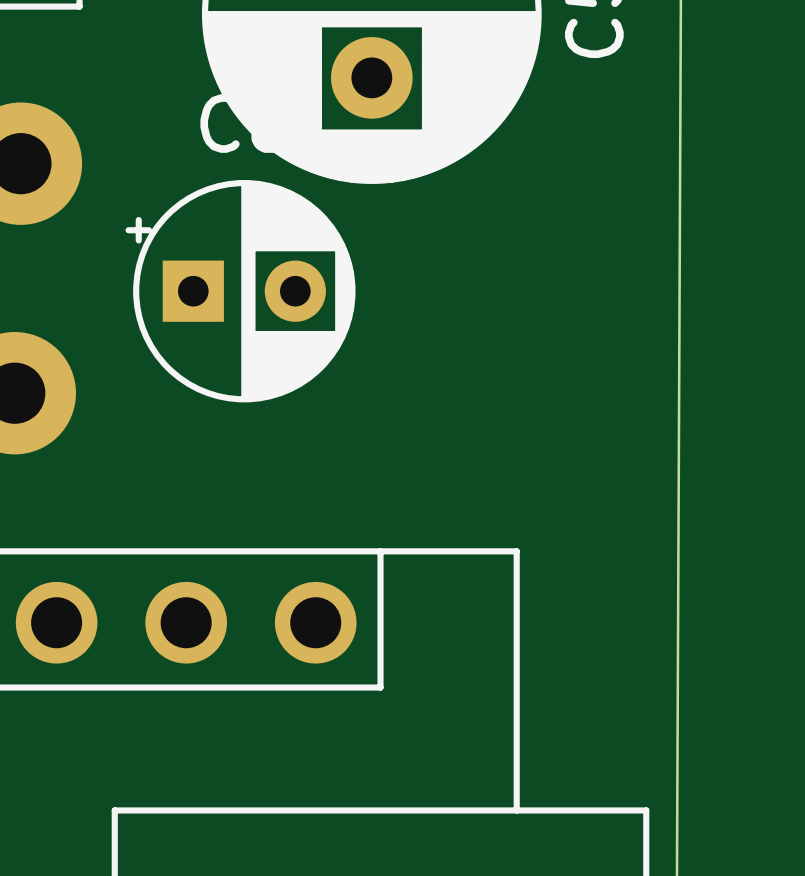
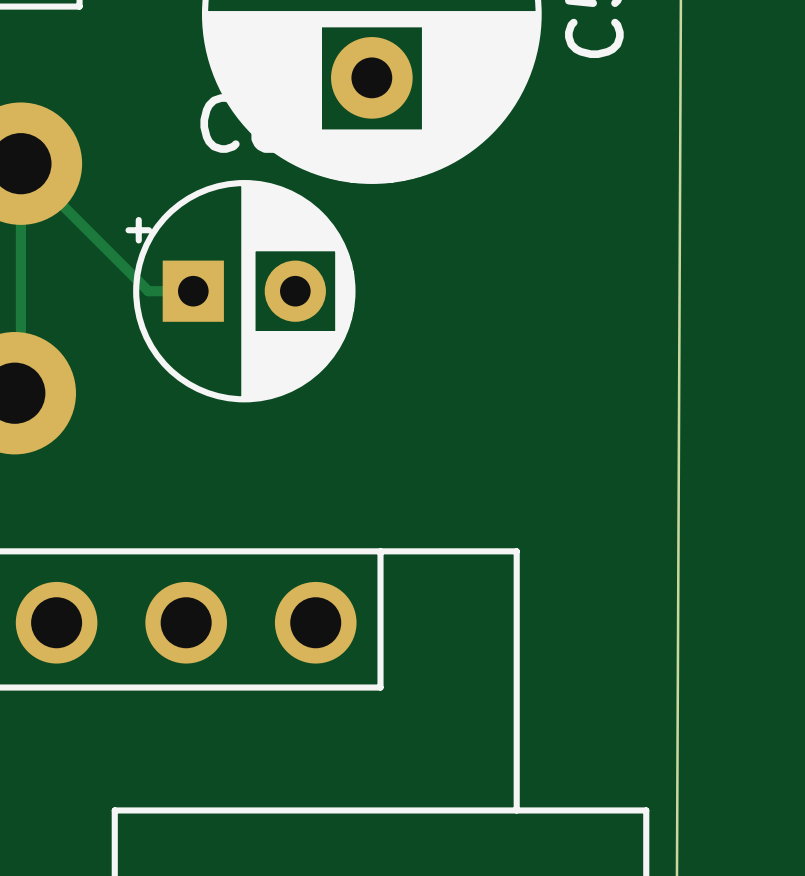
track: none -> (193, 291) (148, 291) (20, 163) (20, 387) (14, 393)

